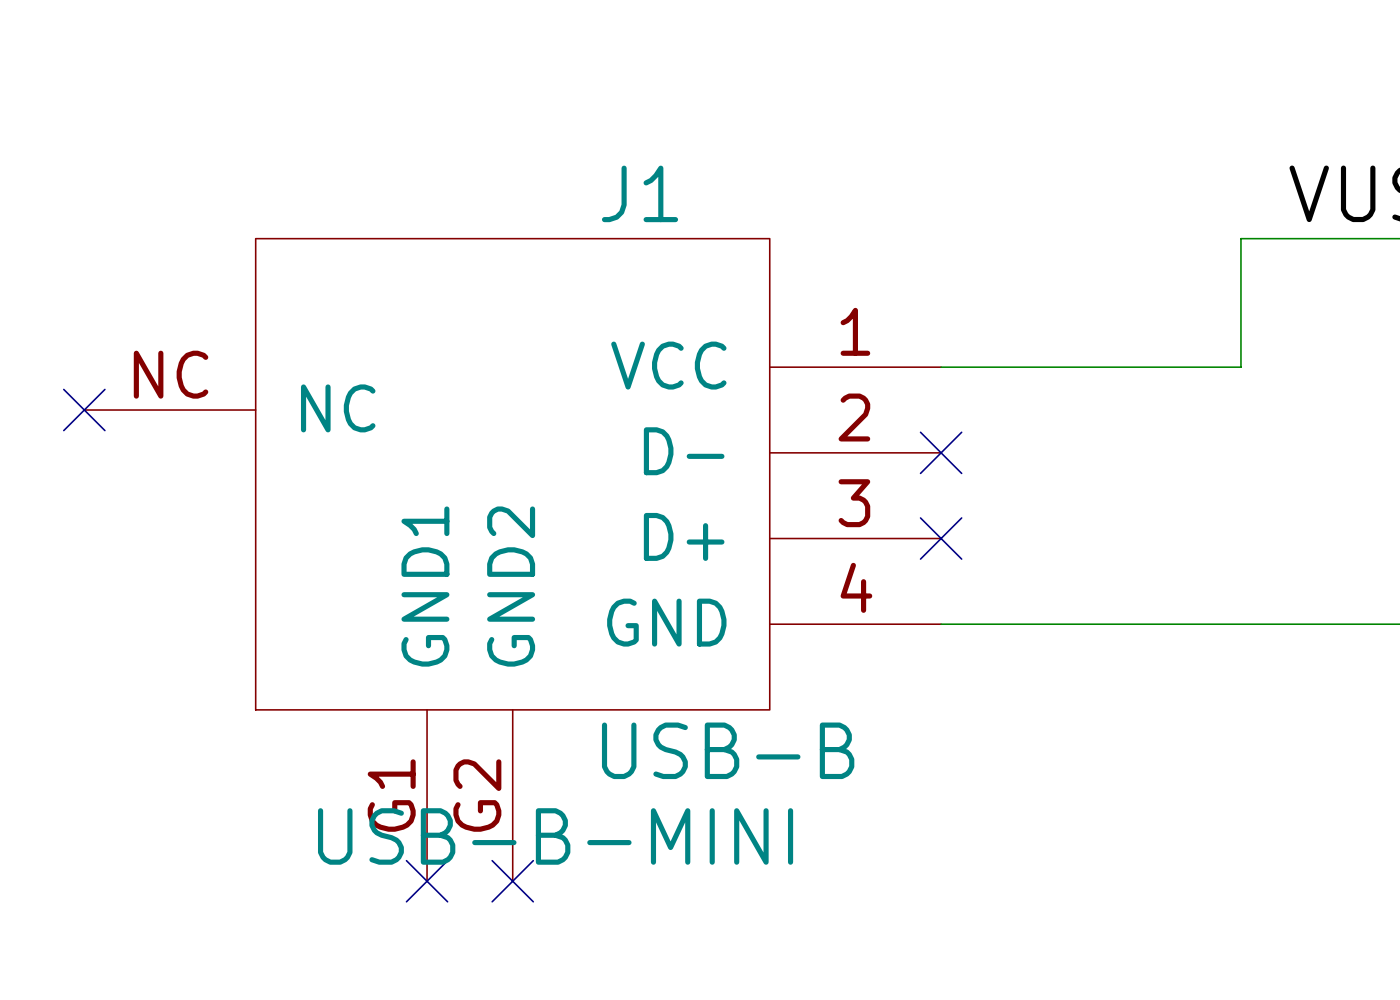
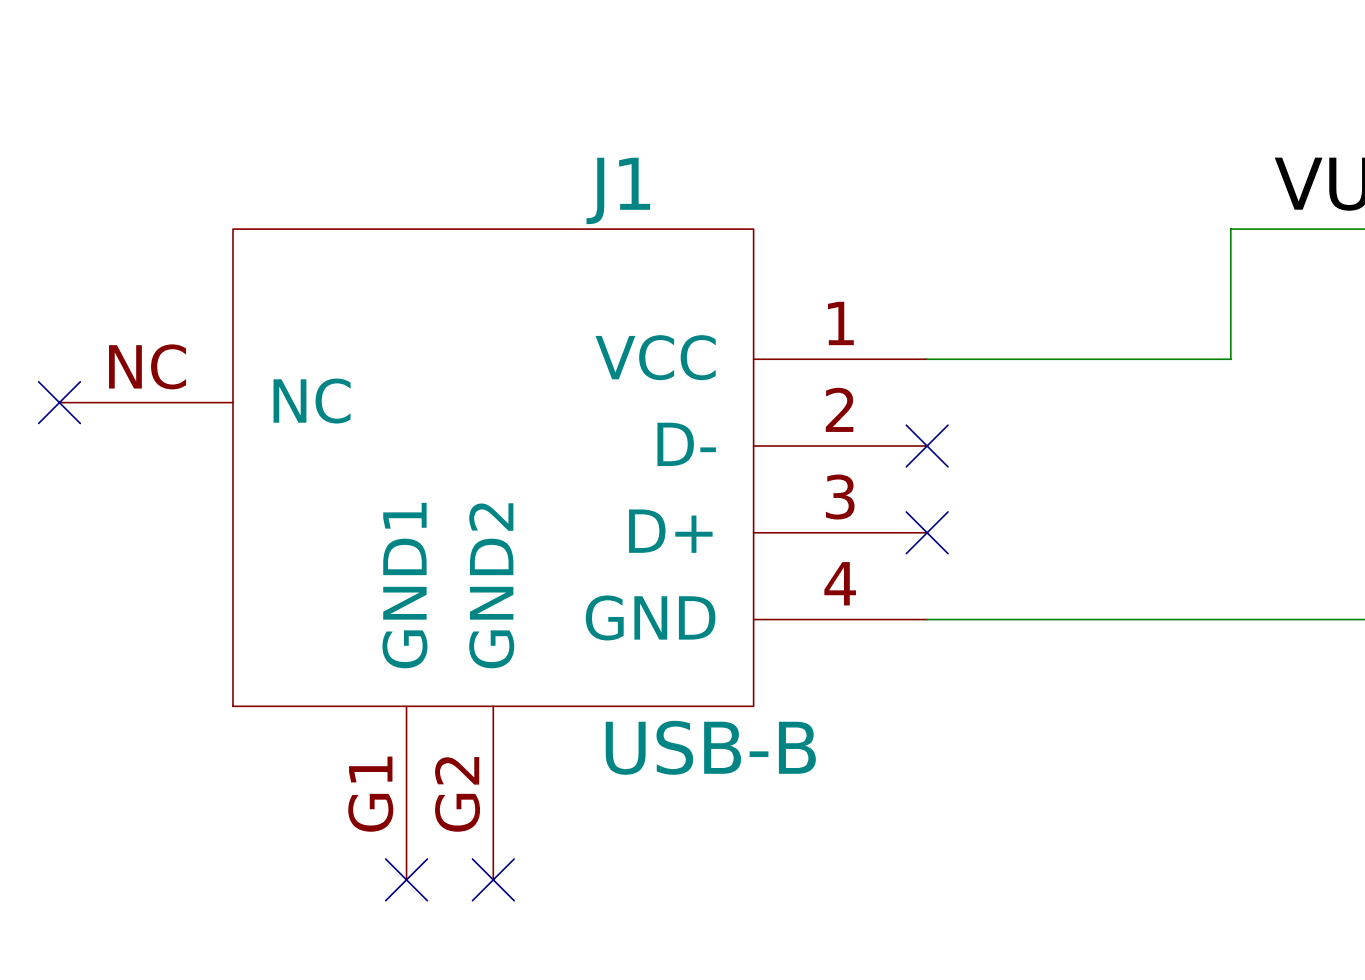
J1 text: USB-B-MINI (555, 836) -> none

